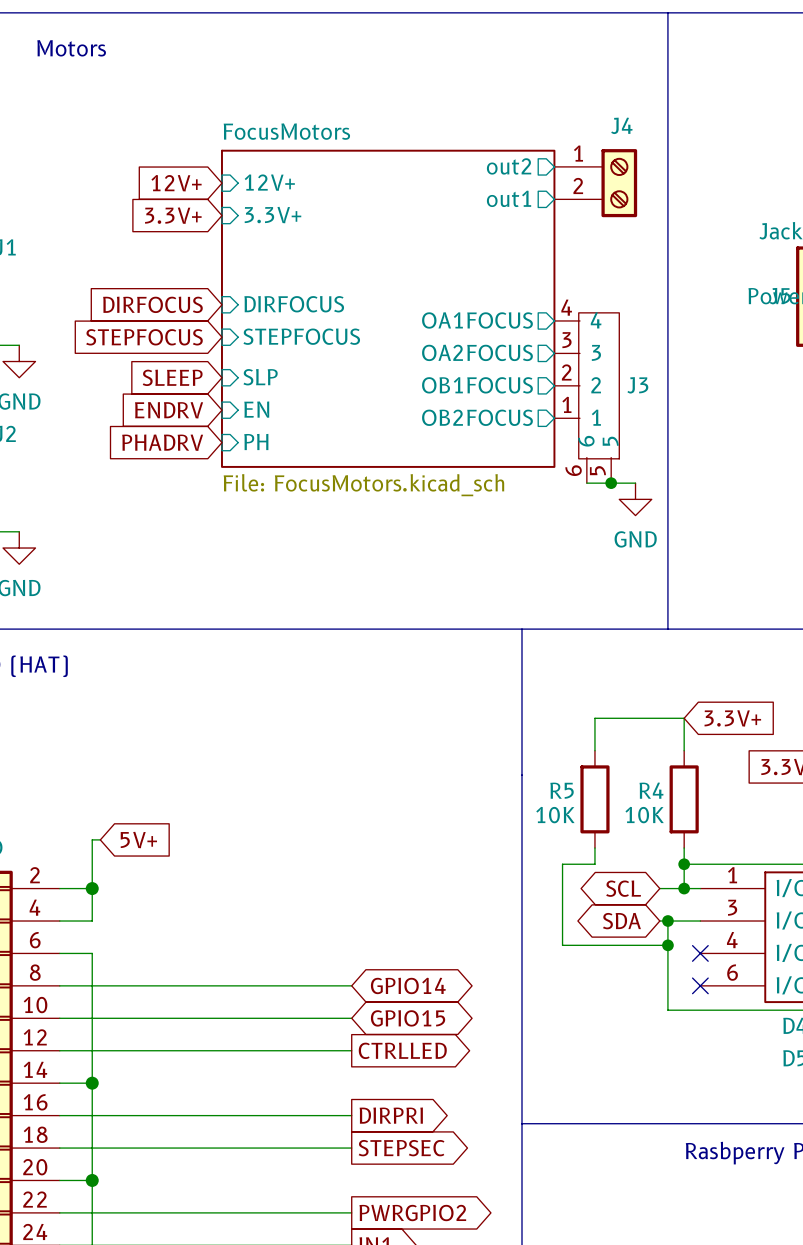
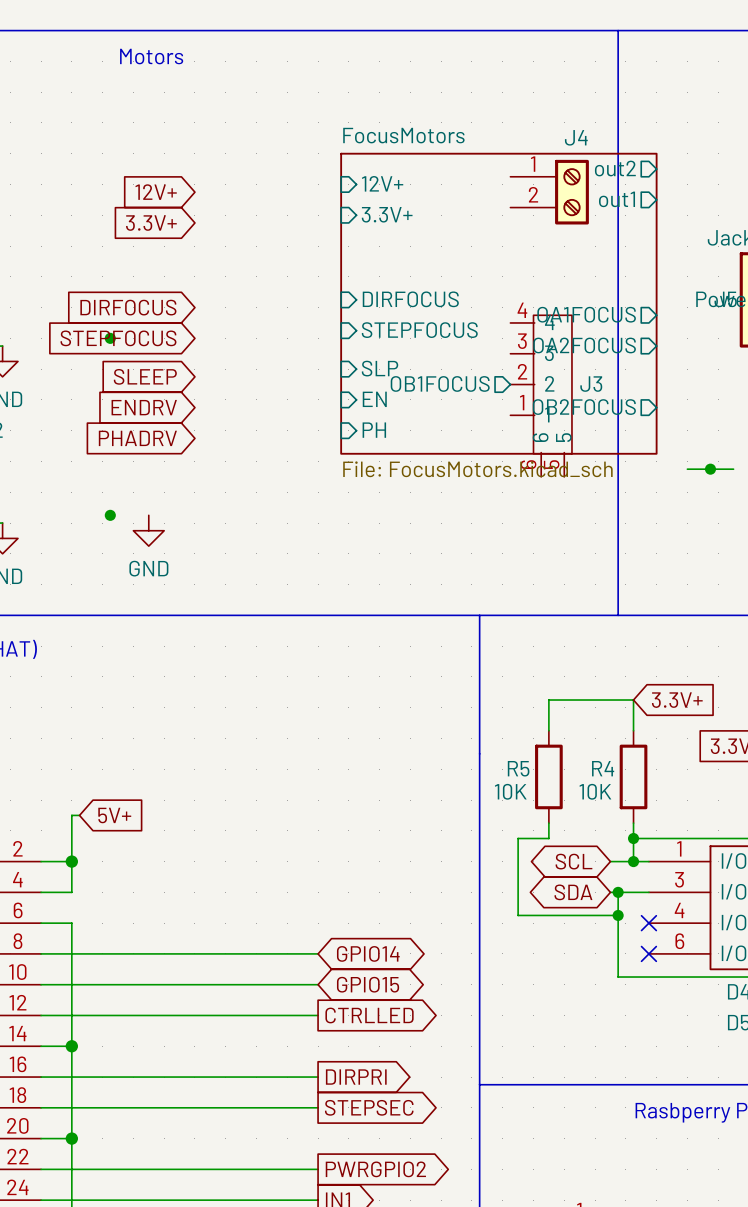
text position: Motors (71, 48) -> Motors (151, 56)
sheet pin position: out2 (509, 166) -> out2 (615, 168)
sheet pin position: 12V+ (269, 182) -> 12V+ (382, 183)
sheet pin position: out1 (509, 198) -> out1 (617, 199)
sheet pin position: 3.3V+ (272, 215) -> 3.3V+ (387, 214)
sheet pin position: DIRFOCUS (294, 304) -> DIRFOCUS (410, 299)
sheet FocusMotors position: (388, 308) -> (498, 303)
sheet pin position: OA1FOCUS (477, 320) -> OA1FOCUS (586, 314)
sheet pin position: STEPFOCUS (301, 336) -> STEPFOCUS (419, 330)
junction: none -> (110, 338)
sheet pin position: OA2FOCUS (477, 352) -> OA2FOCUS (584, 345)
sheet pin position: SLP (260, 377) -> SLP (380, 368)
sheet pin position: EN (256, 409) -> EN (374, 399)
sheet pin position: OB2FOCUS (477, 417) -> OB2FOCUS (584, 407)
sheet pin position: PH (256, 442) -> PH (374, 430)
junction: none -> (710, 469)
wire: (586, 483) (635, 483) -> (687, 469) (733, 469)
junction: (611, 483) -> none
power symbol: GND (635, 499) -> none
junction: none -> (110, 515)
power symbol: none -> GND (148, 530)

